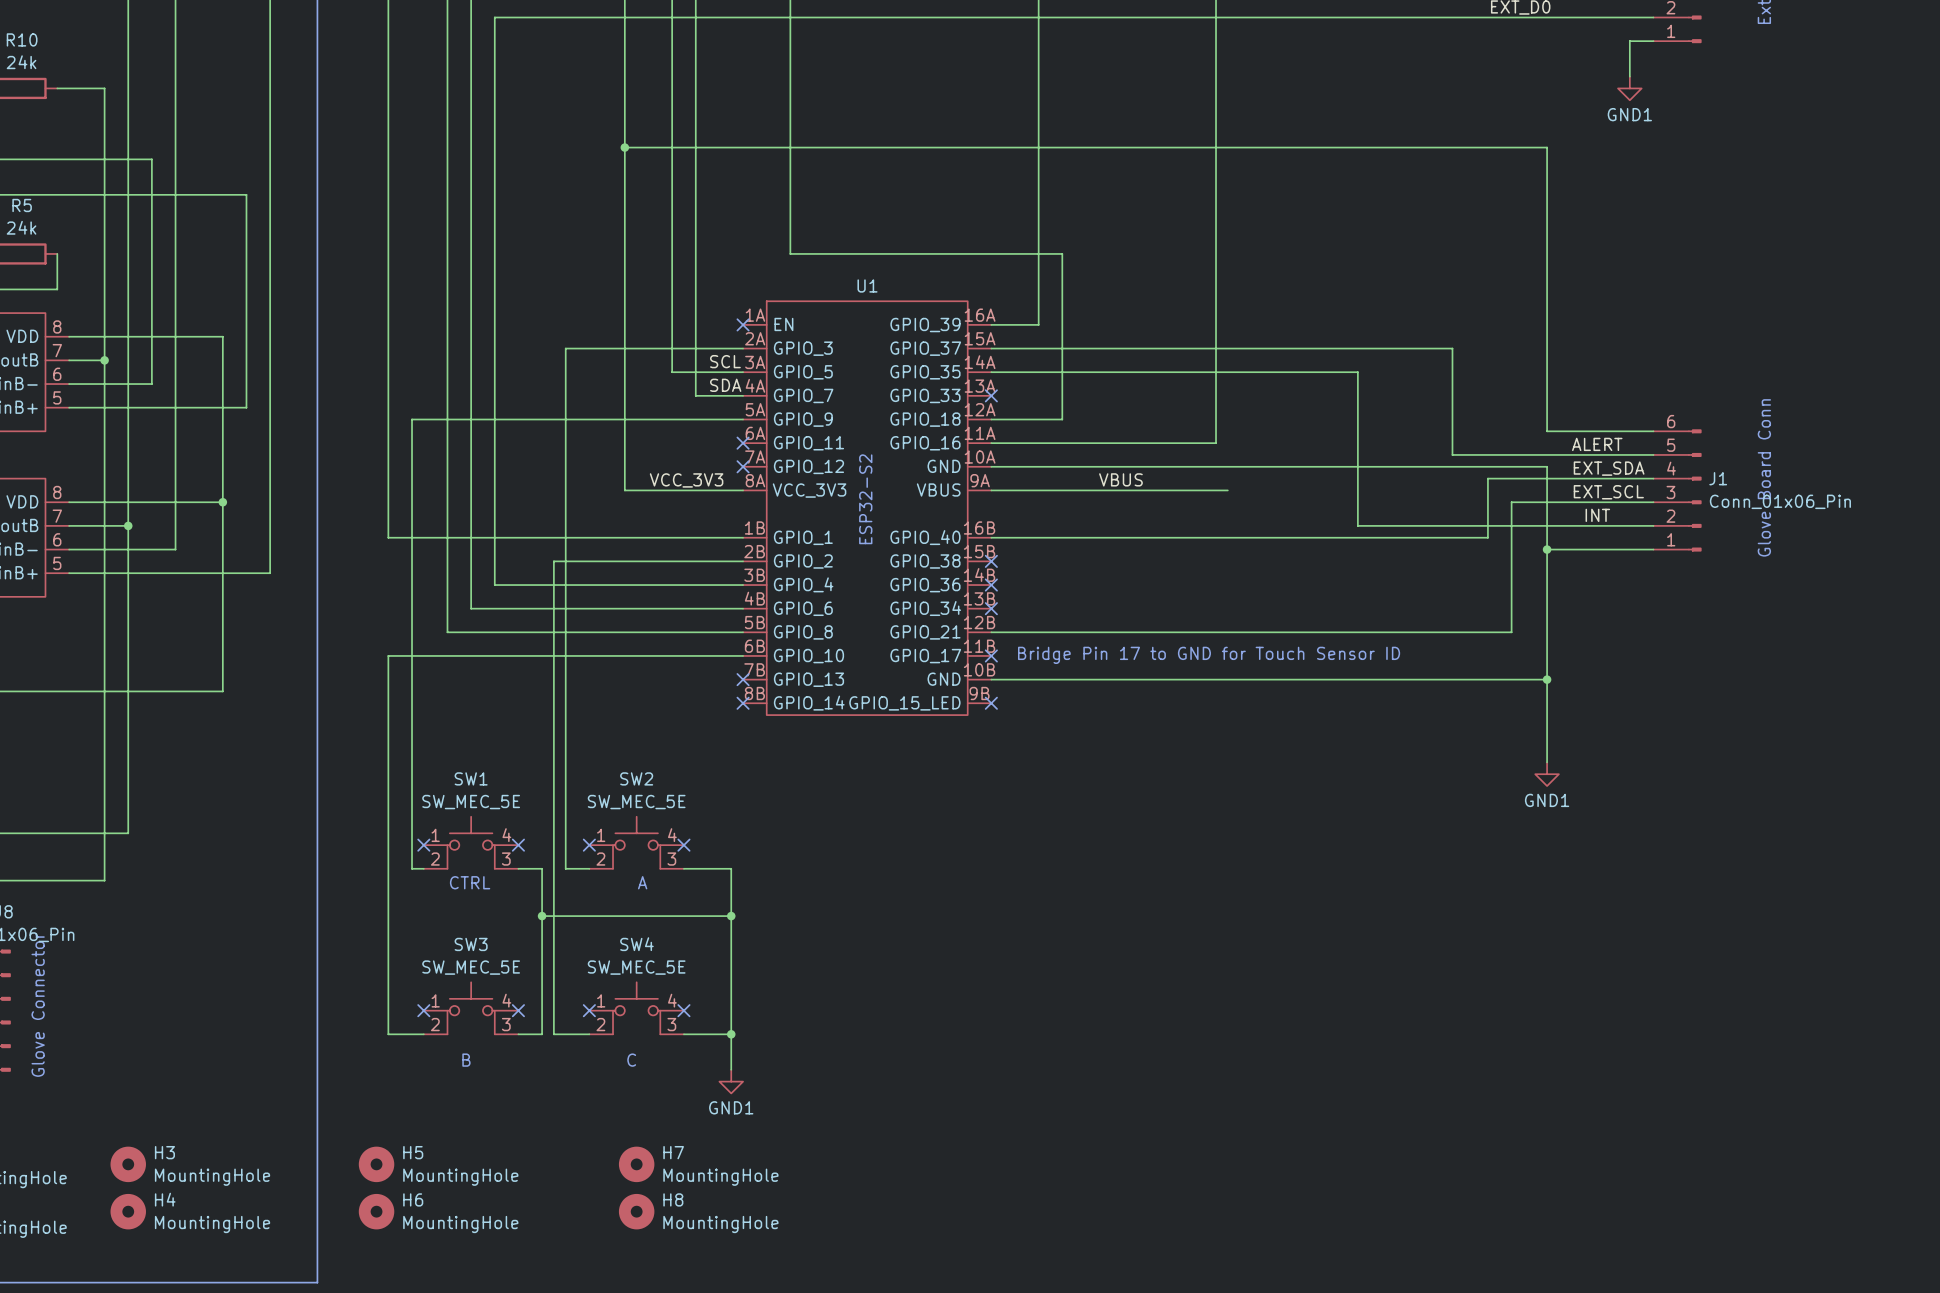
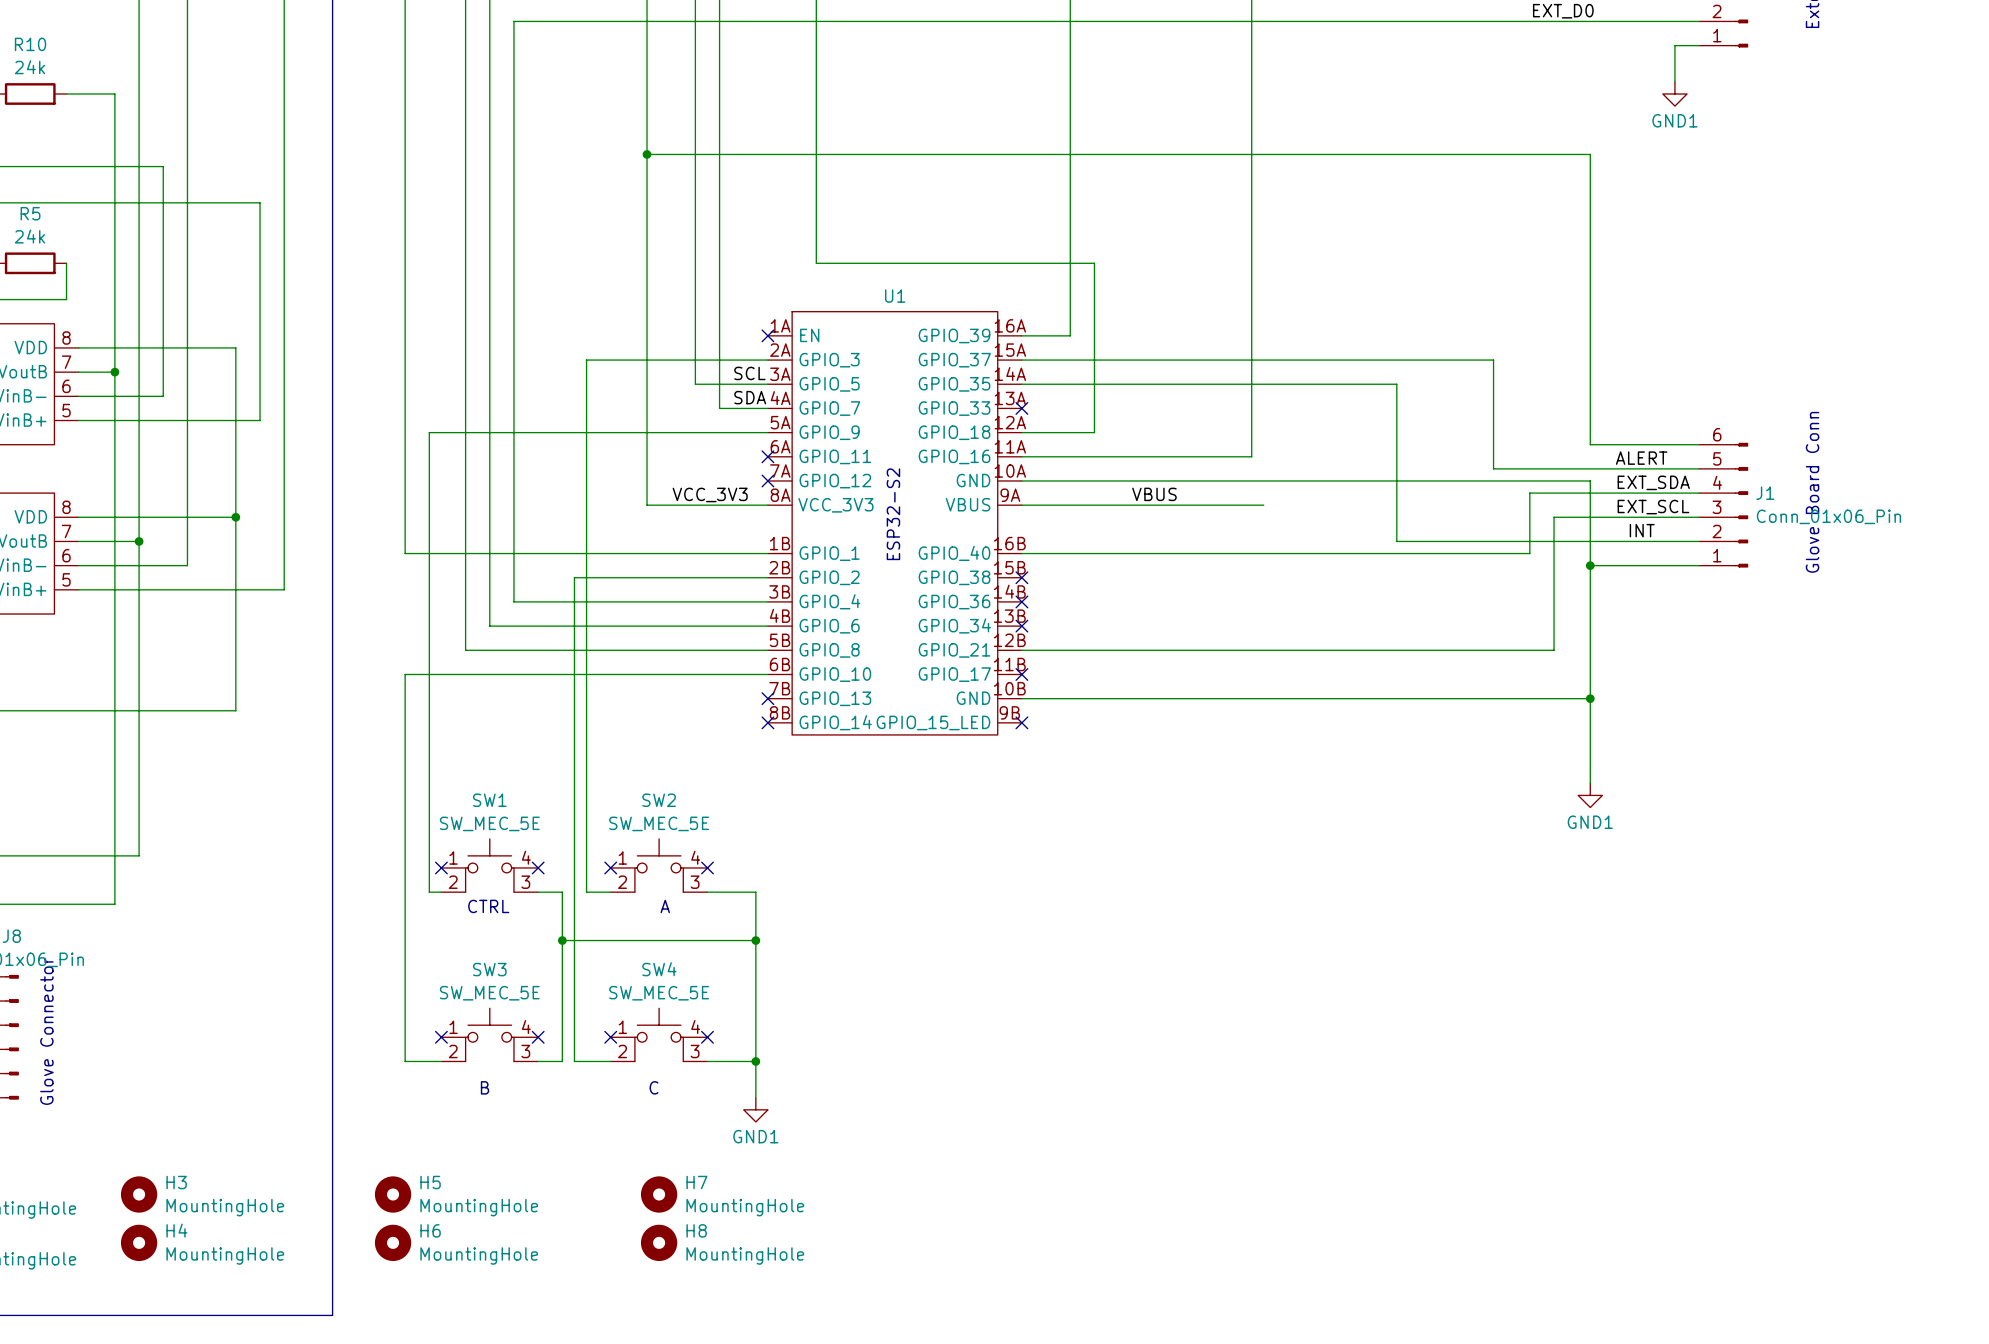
text: Bridge Pin 17 to GND for Touch Sensor ID (1209, 655) -> none

